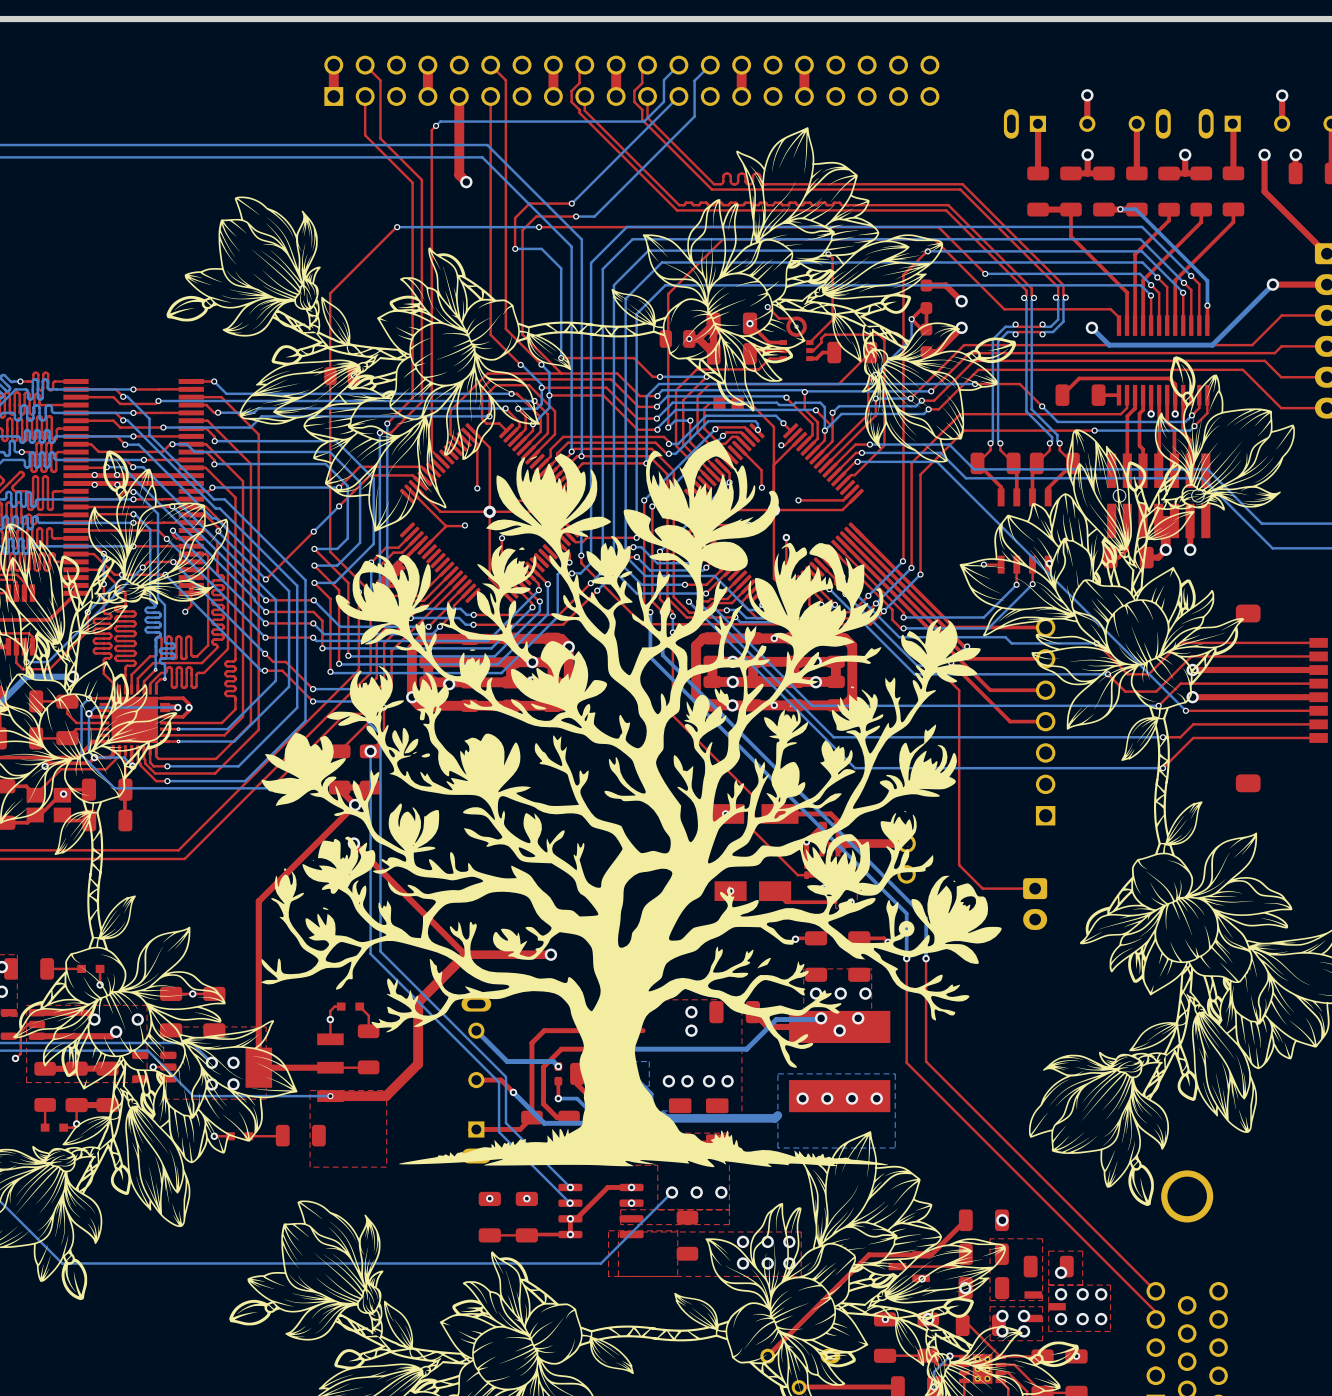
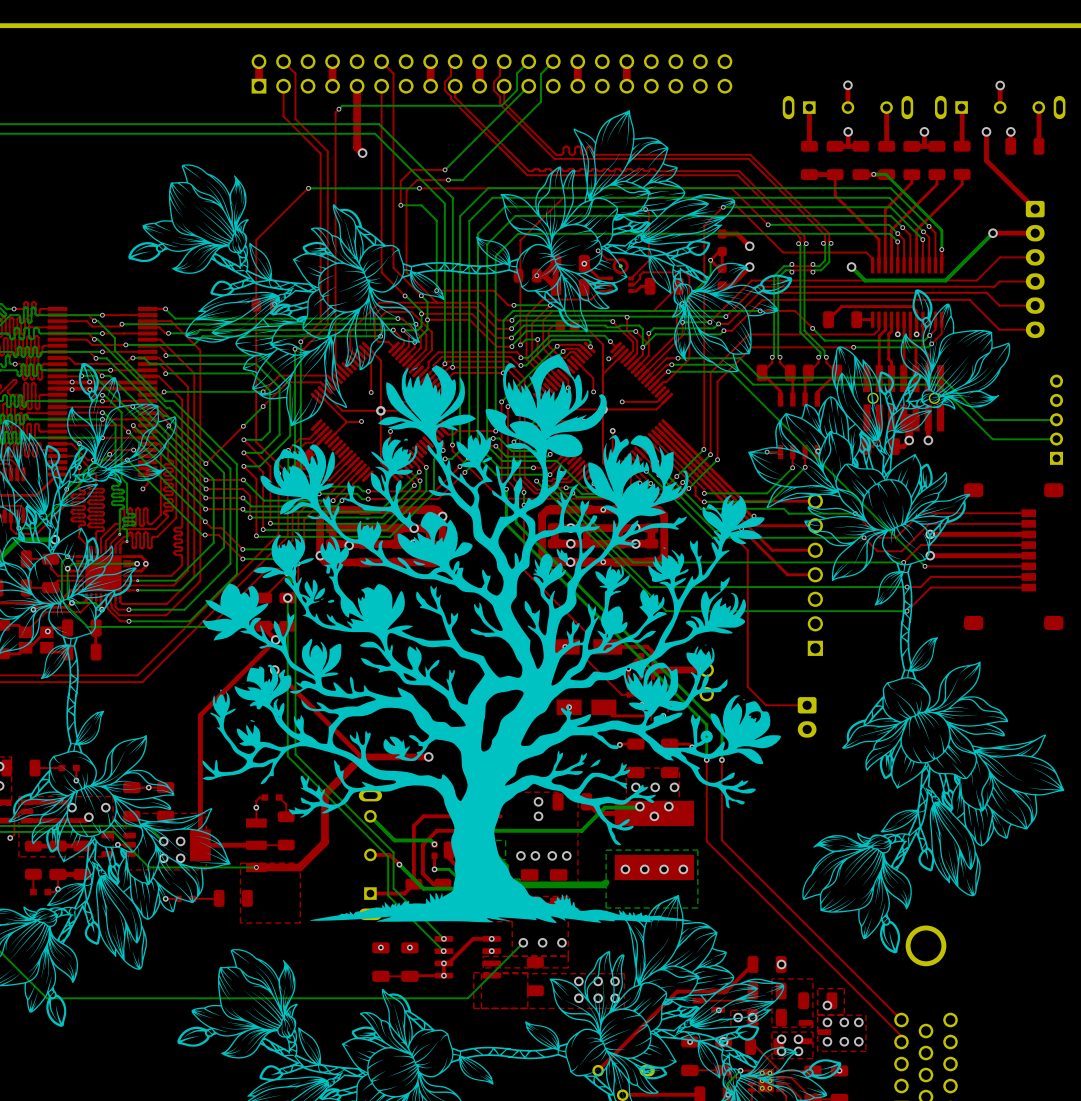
top zone outline: none -> (757, 1010) (730, 1010) (730, 1027) (757, 1027) (757, 1010)
via: none -> (738, 1017)

